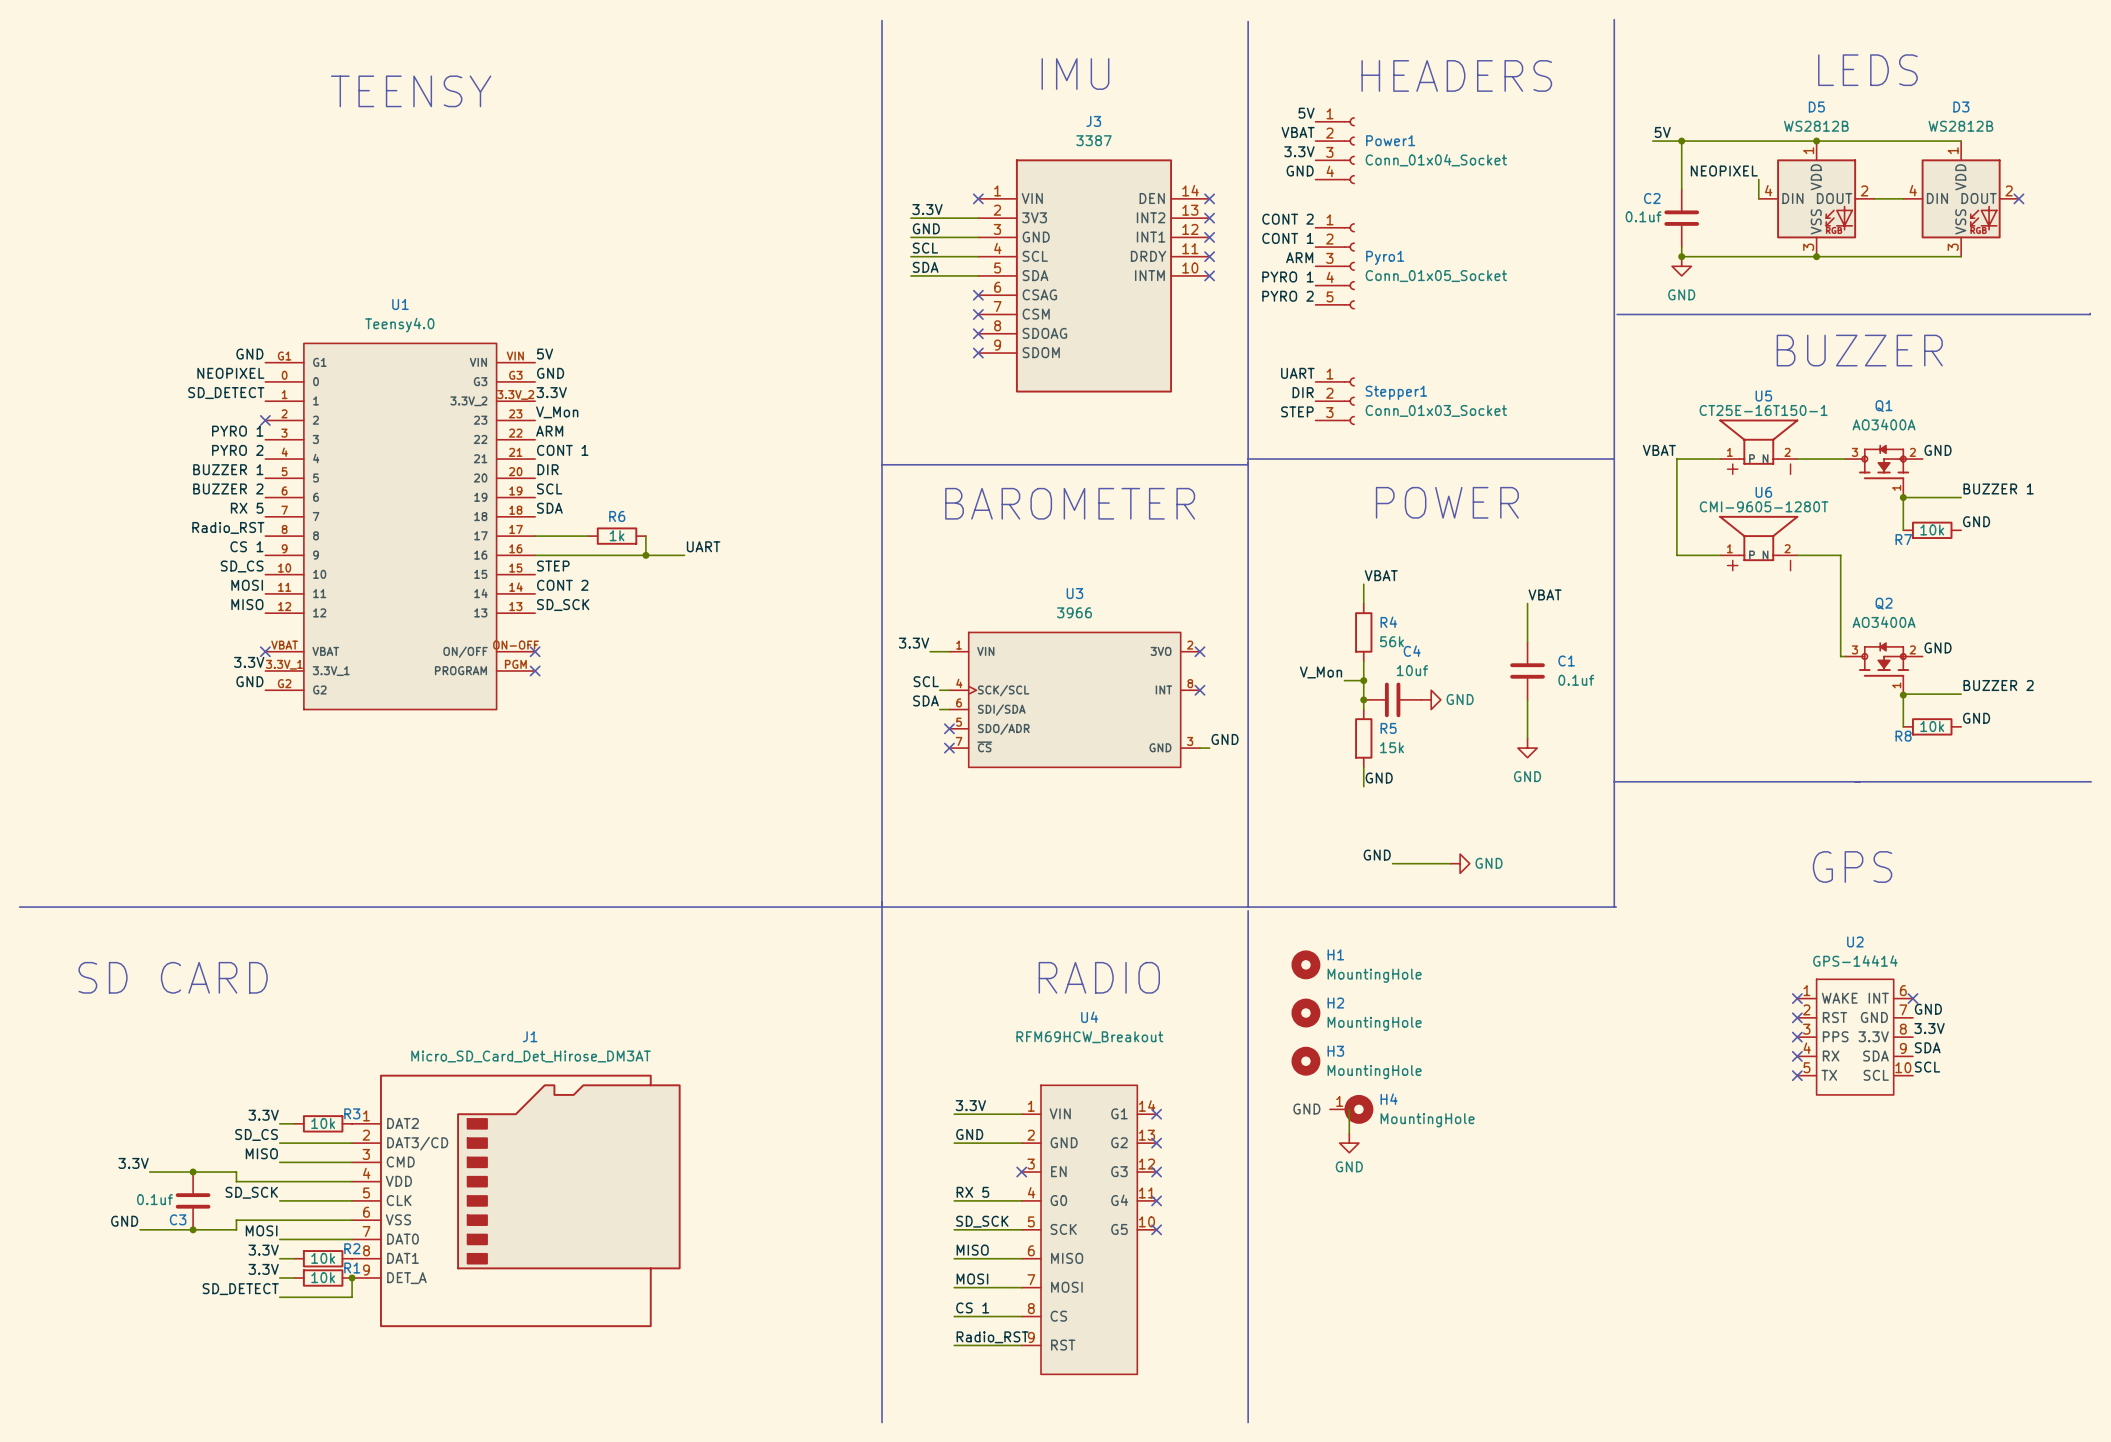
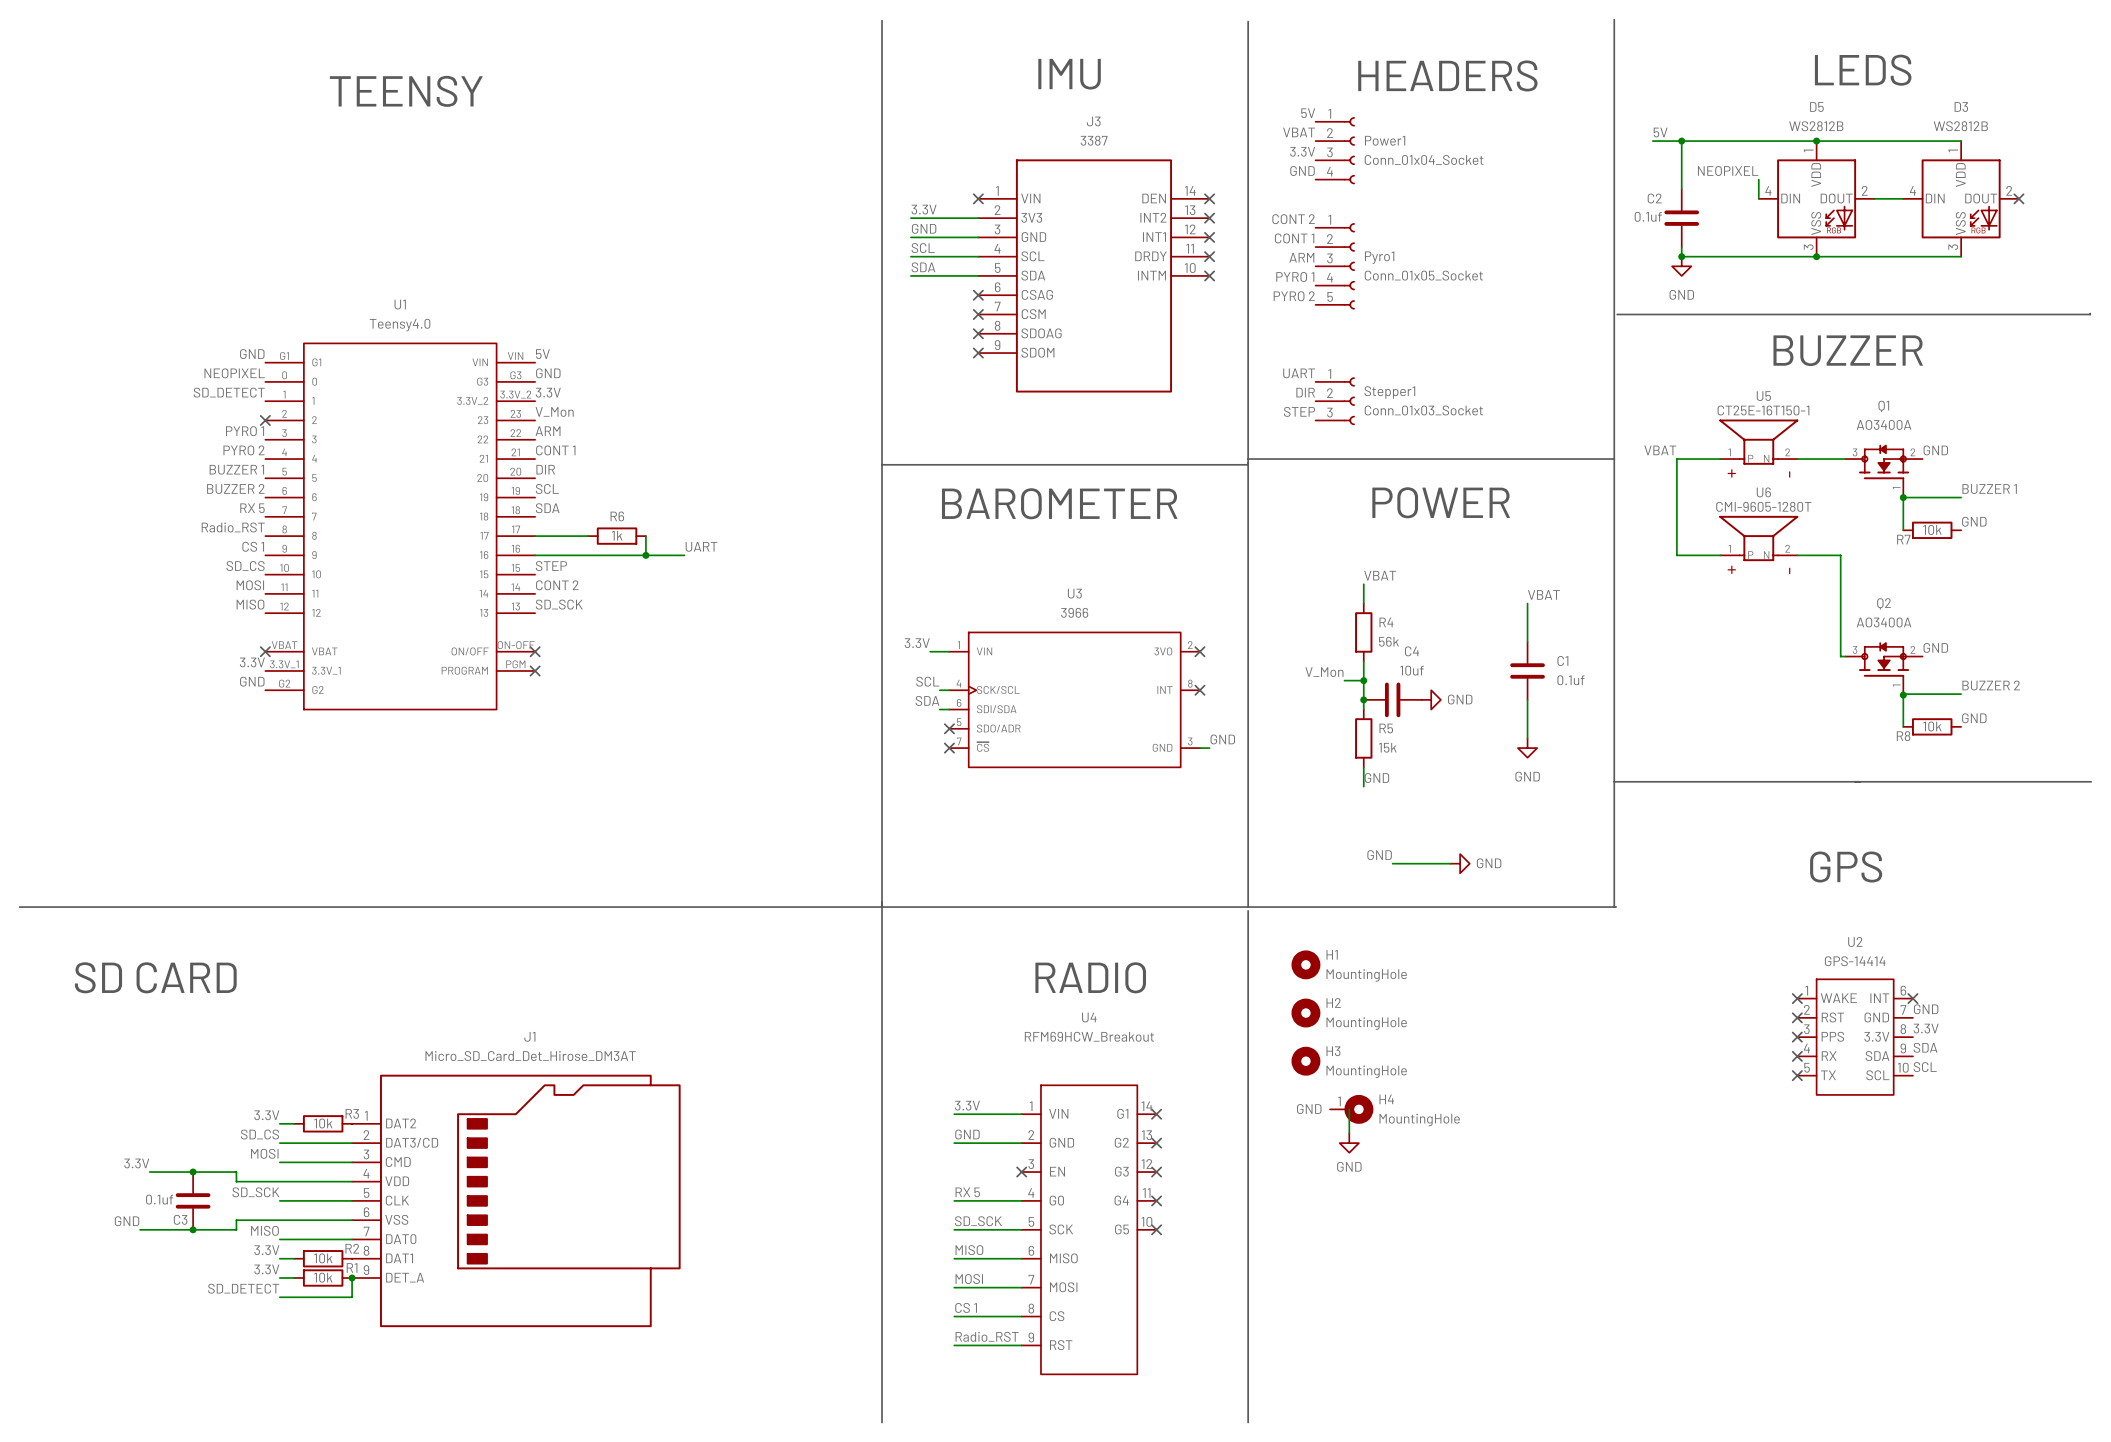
label: MISO (261, 1153) -> MOSI (264, 1153)
label: MOSI (261, 1230) -> MISO (264, 1230)

